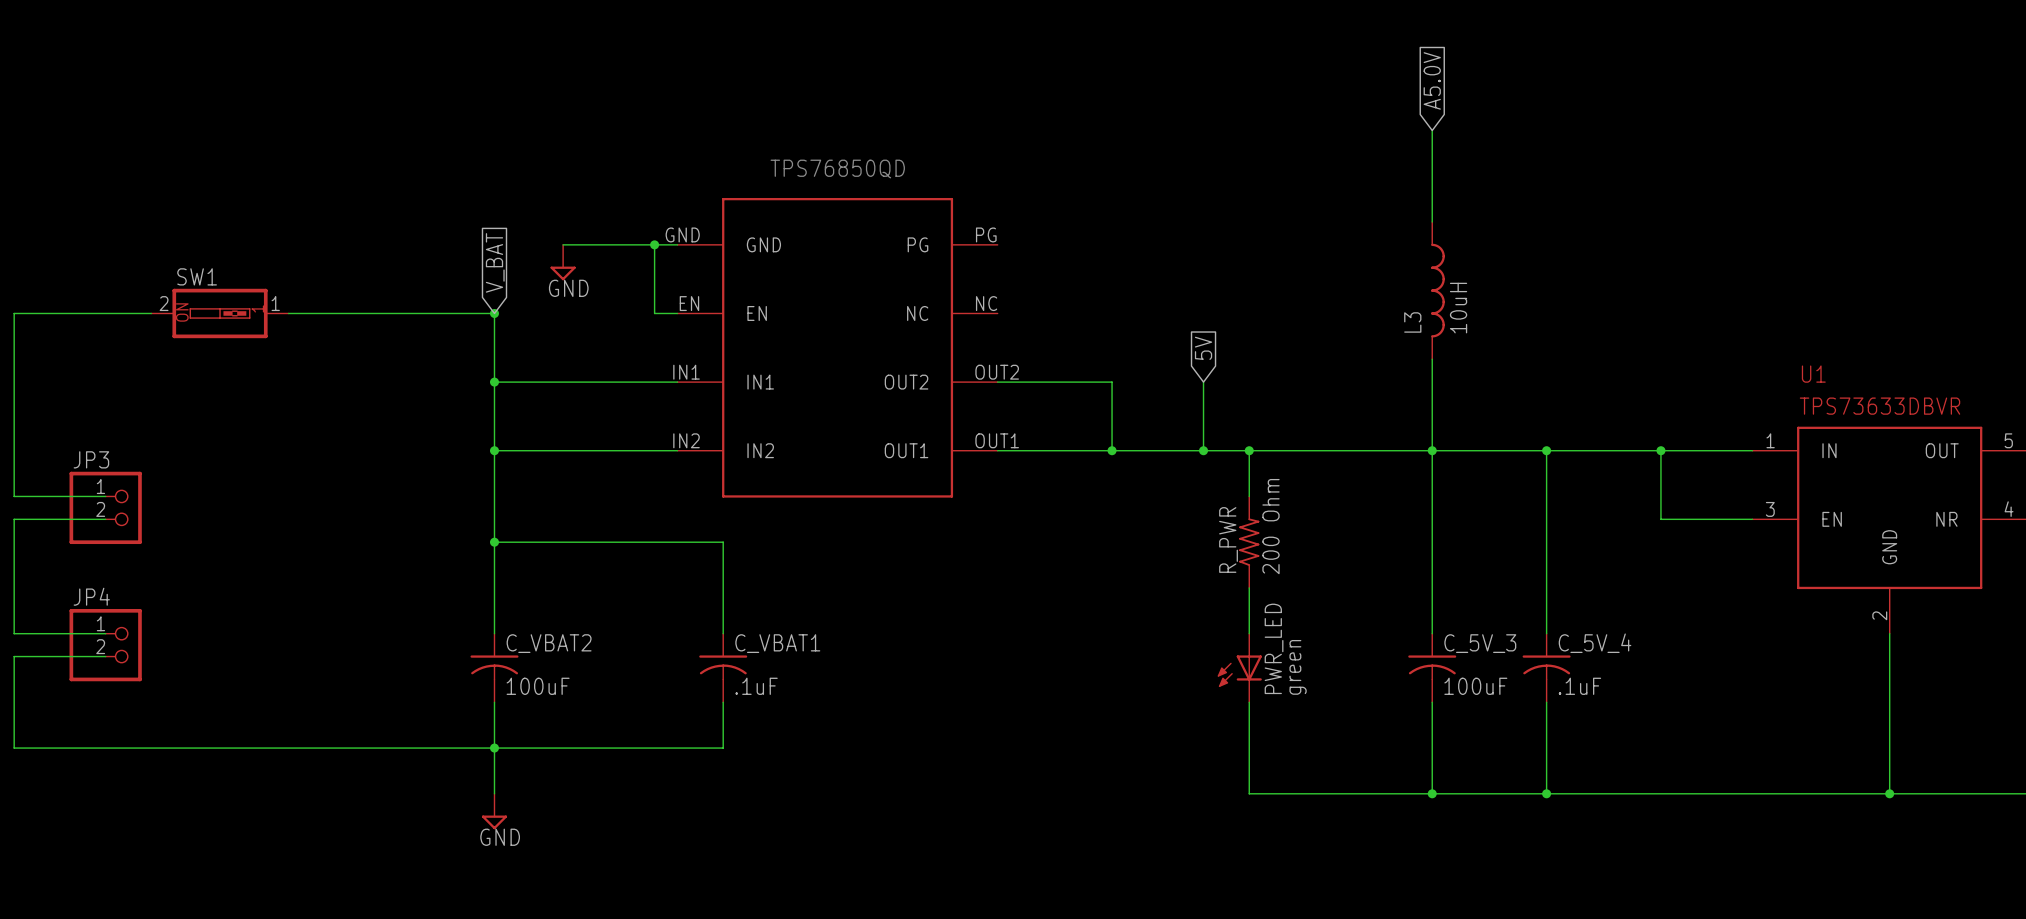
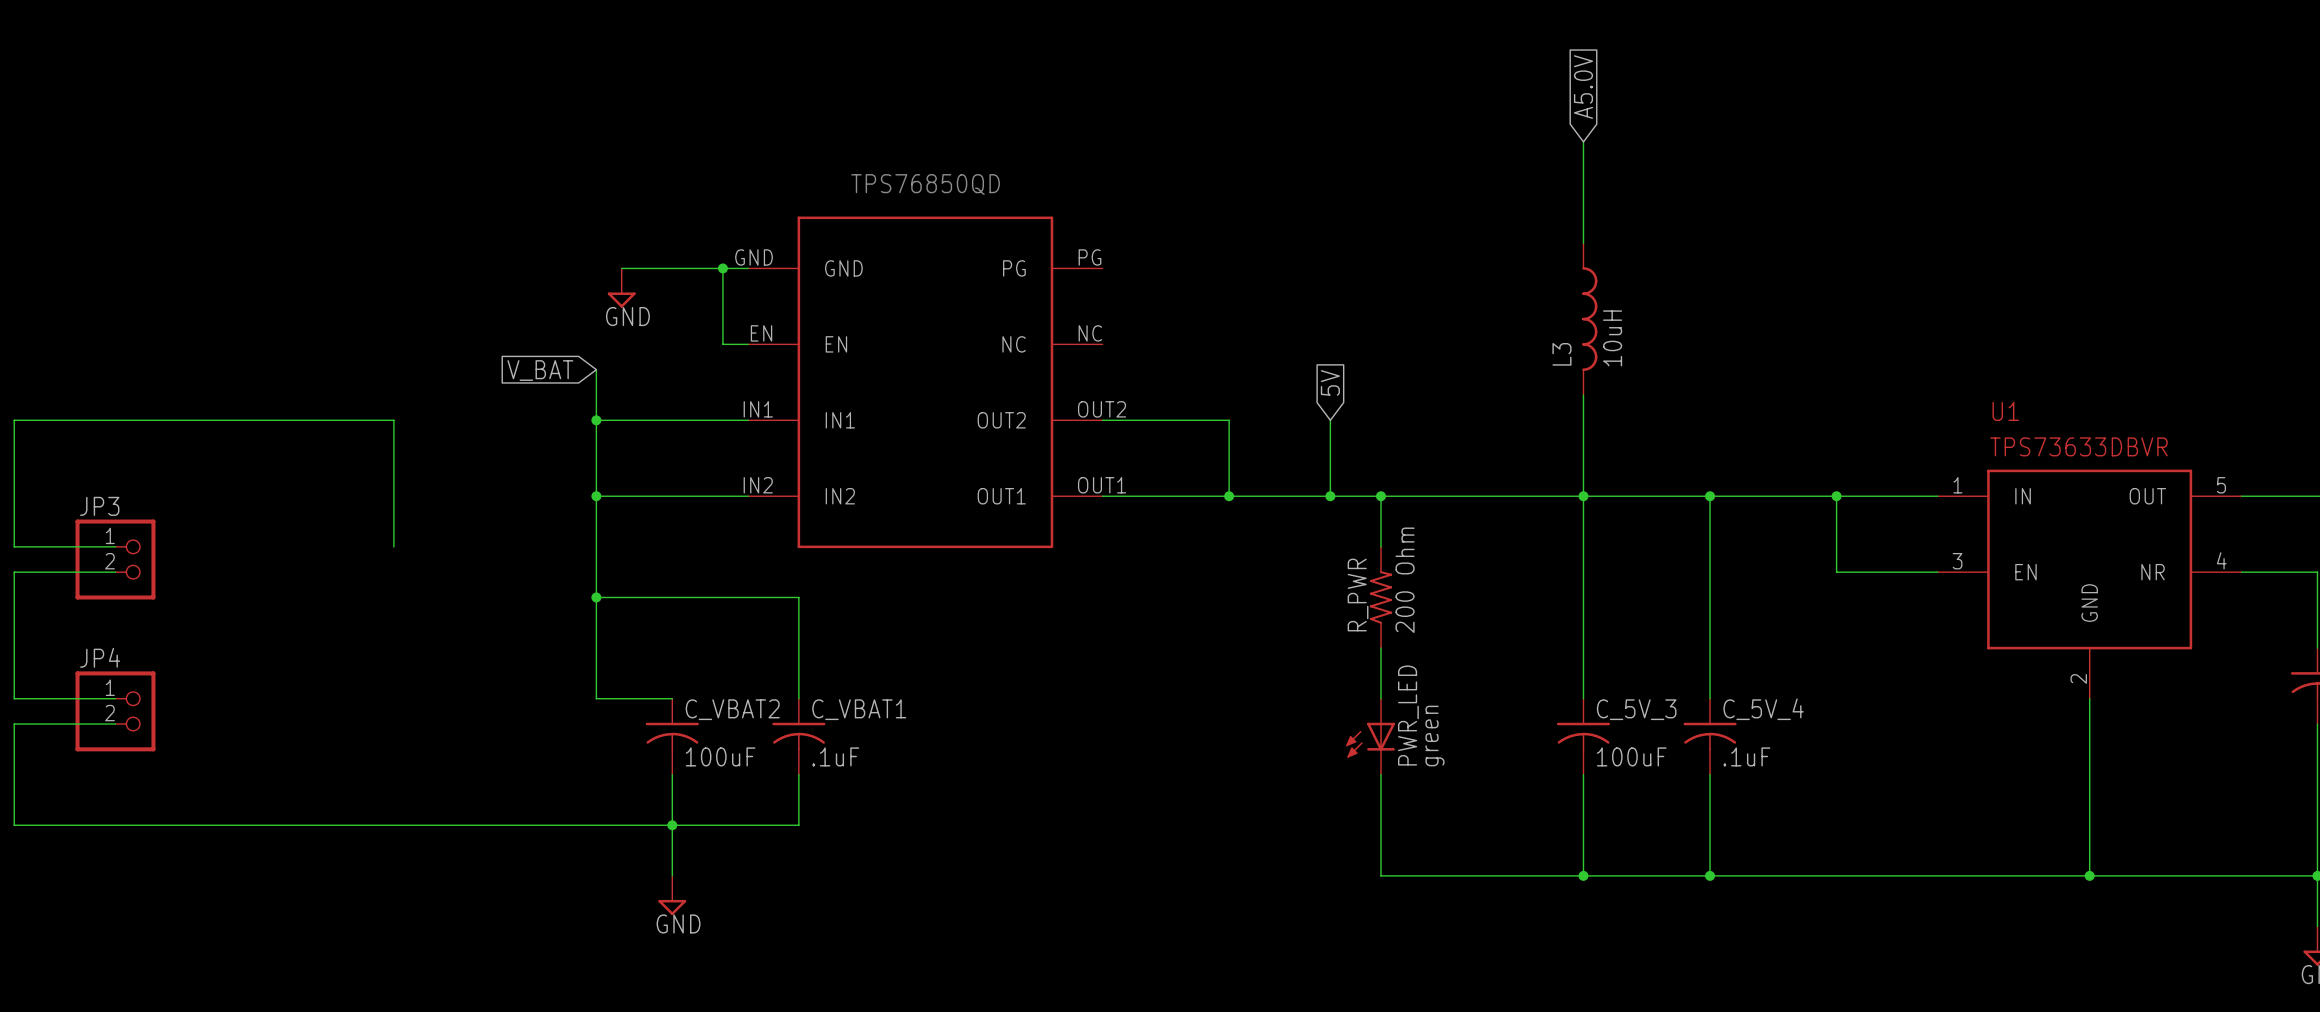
global label rotation: 0° (495, 262) -> 90° counterclockwise (540, 370)
wire: (151, 313) (14, 313) (14, 382) -> (393, 546) (393, 420) (14, 420)
SW1: (220, 313) -> none
wire: (288, 313) (494, 313) (494, 633) -> none
junction: (494, 313) -> none
wire: none -> (596, 369) (596, 698) (672, 698)
wire: (494, 382) (540, 382) -> none
junction: (494, 382) -> none
junction: none -> (596, 420)
wire: (494, 450) (540, 450) -> none
junction: (494, 450) -> none
junction: none -> (596, 496)
wire: (494, 542) (540, 542) -> none
junction position: (494, 542) -> (596, 597)
C_VBAT2 position: (494, 668) -> (672, 736)
wire: (494, 702) (494, 793) -> (672, 774) (672, 875)
junction: (494, 748) -> none
junction: none -> (672, 825)
power symbol position: GND (494, 811) -> GND (672, 895)

